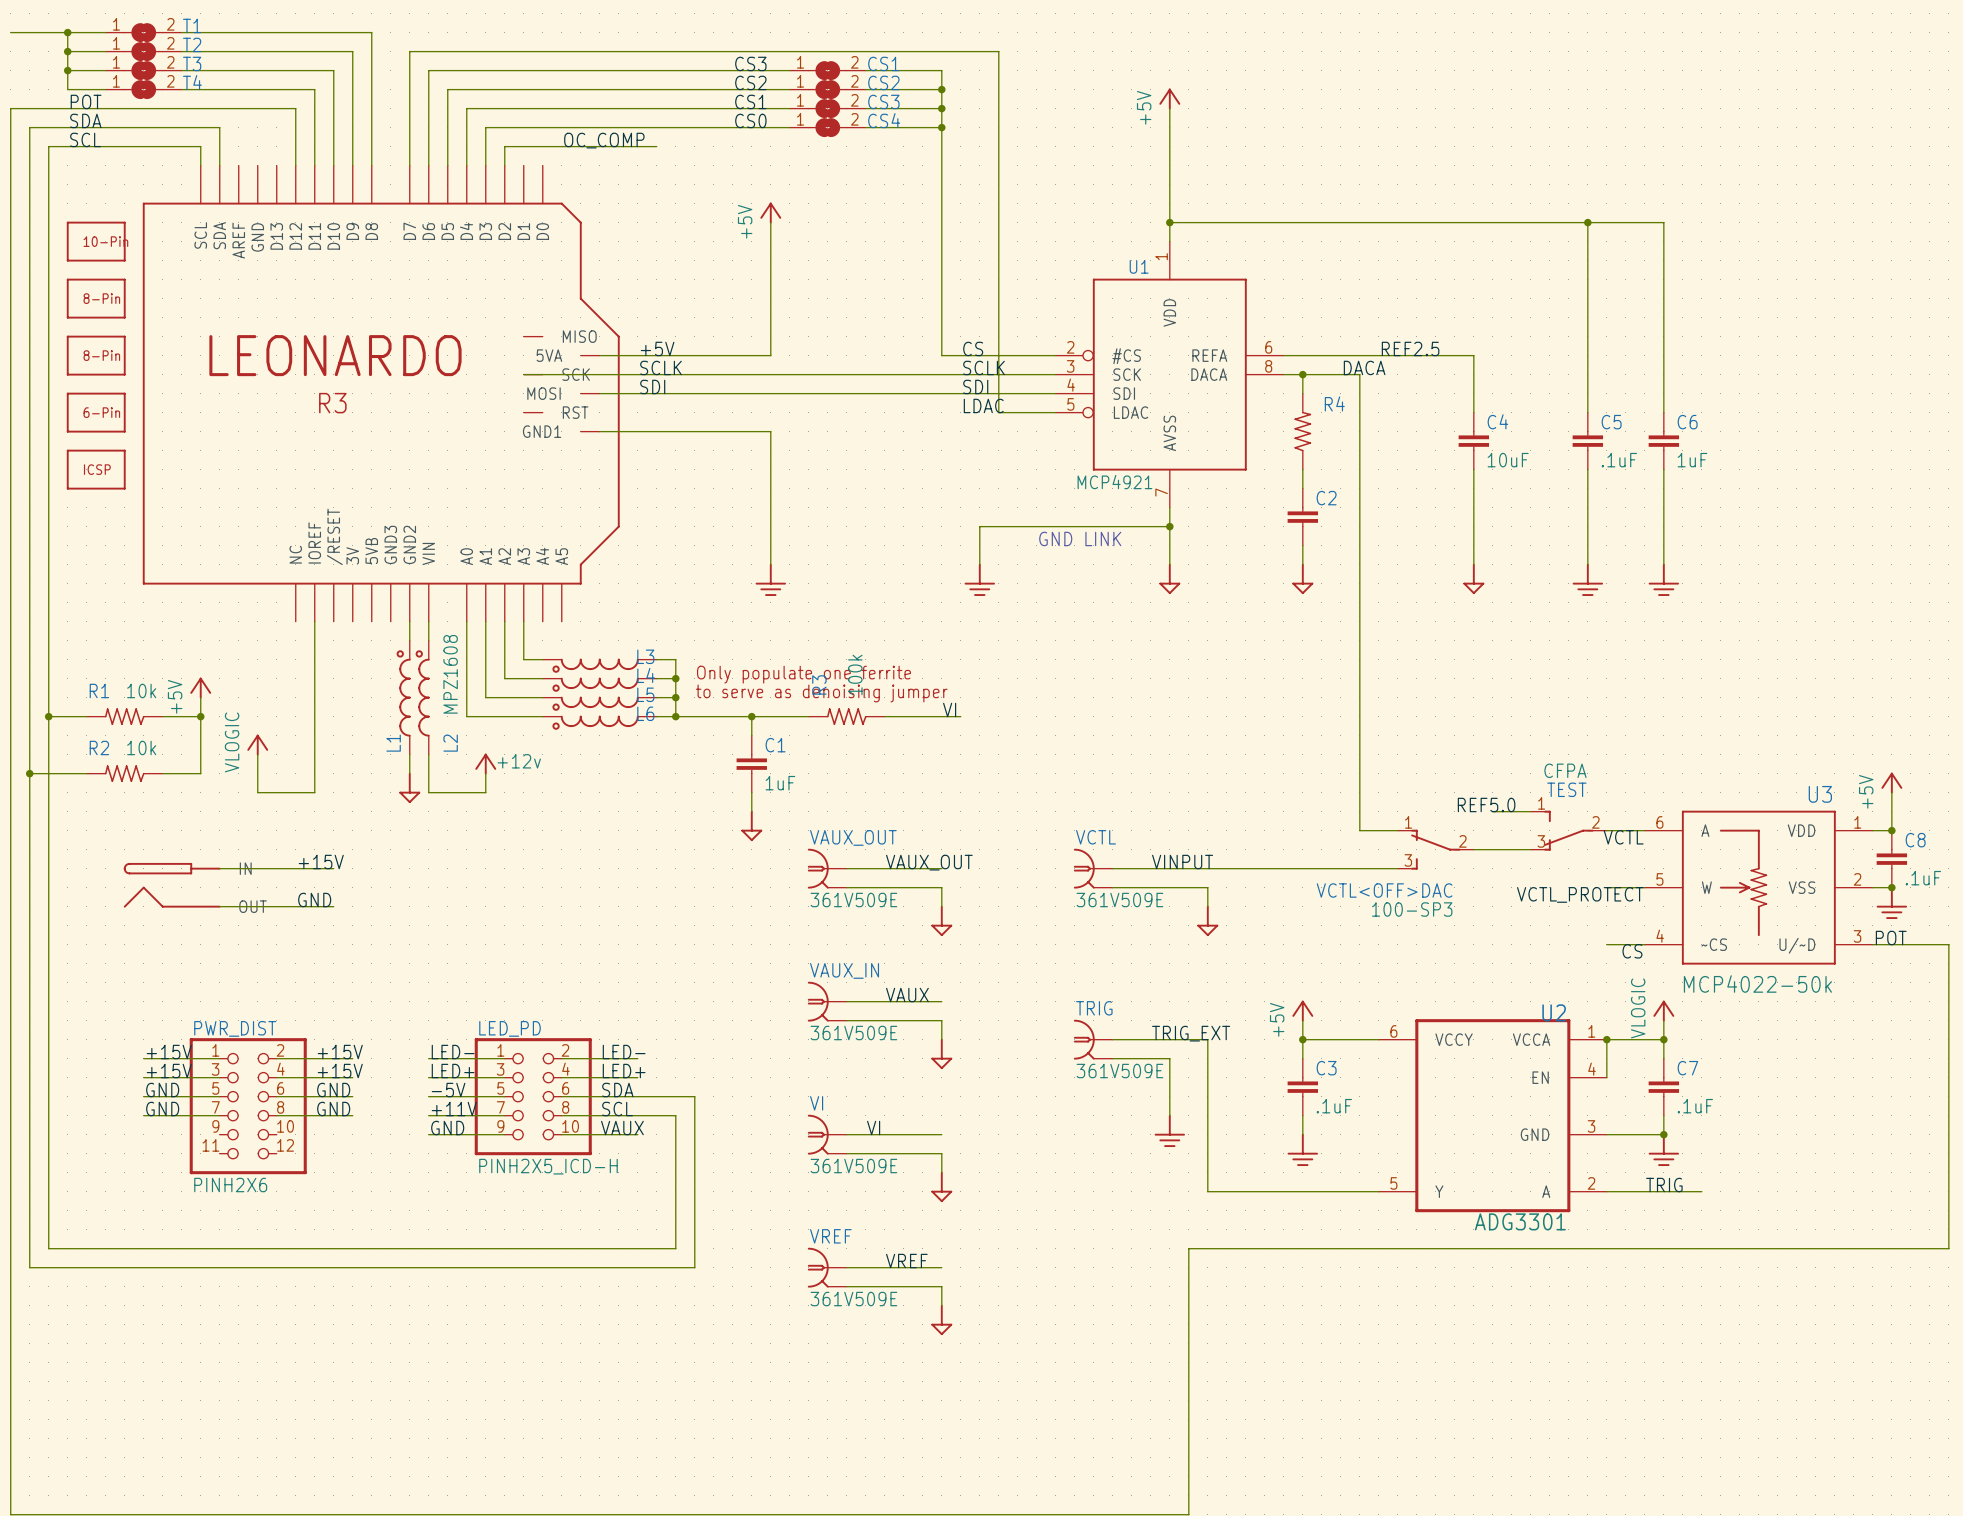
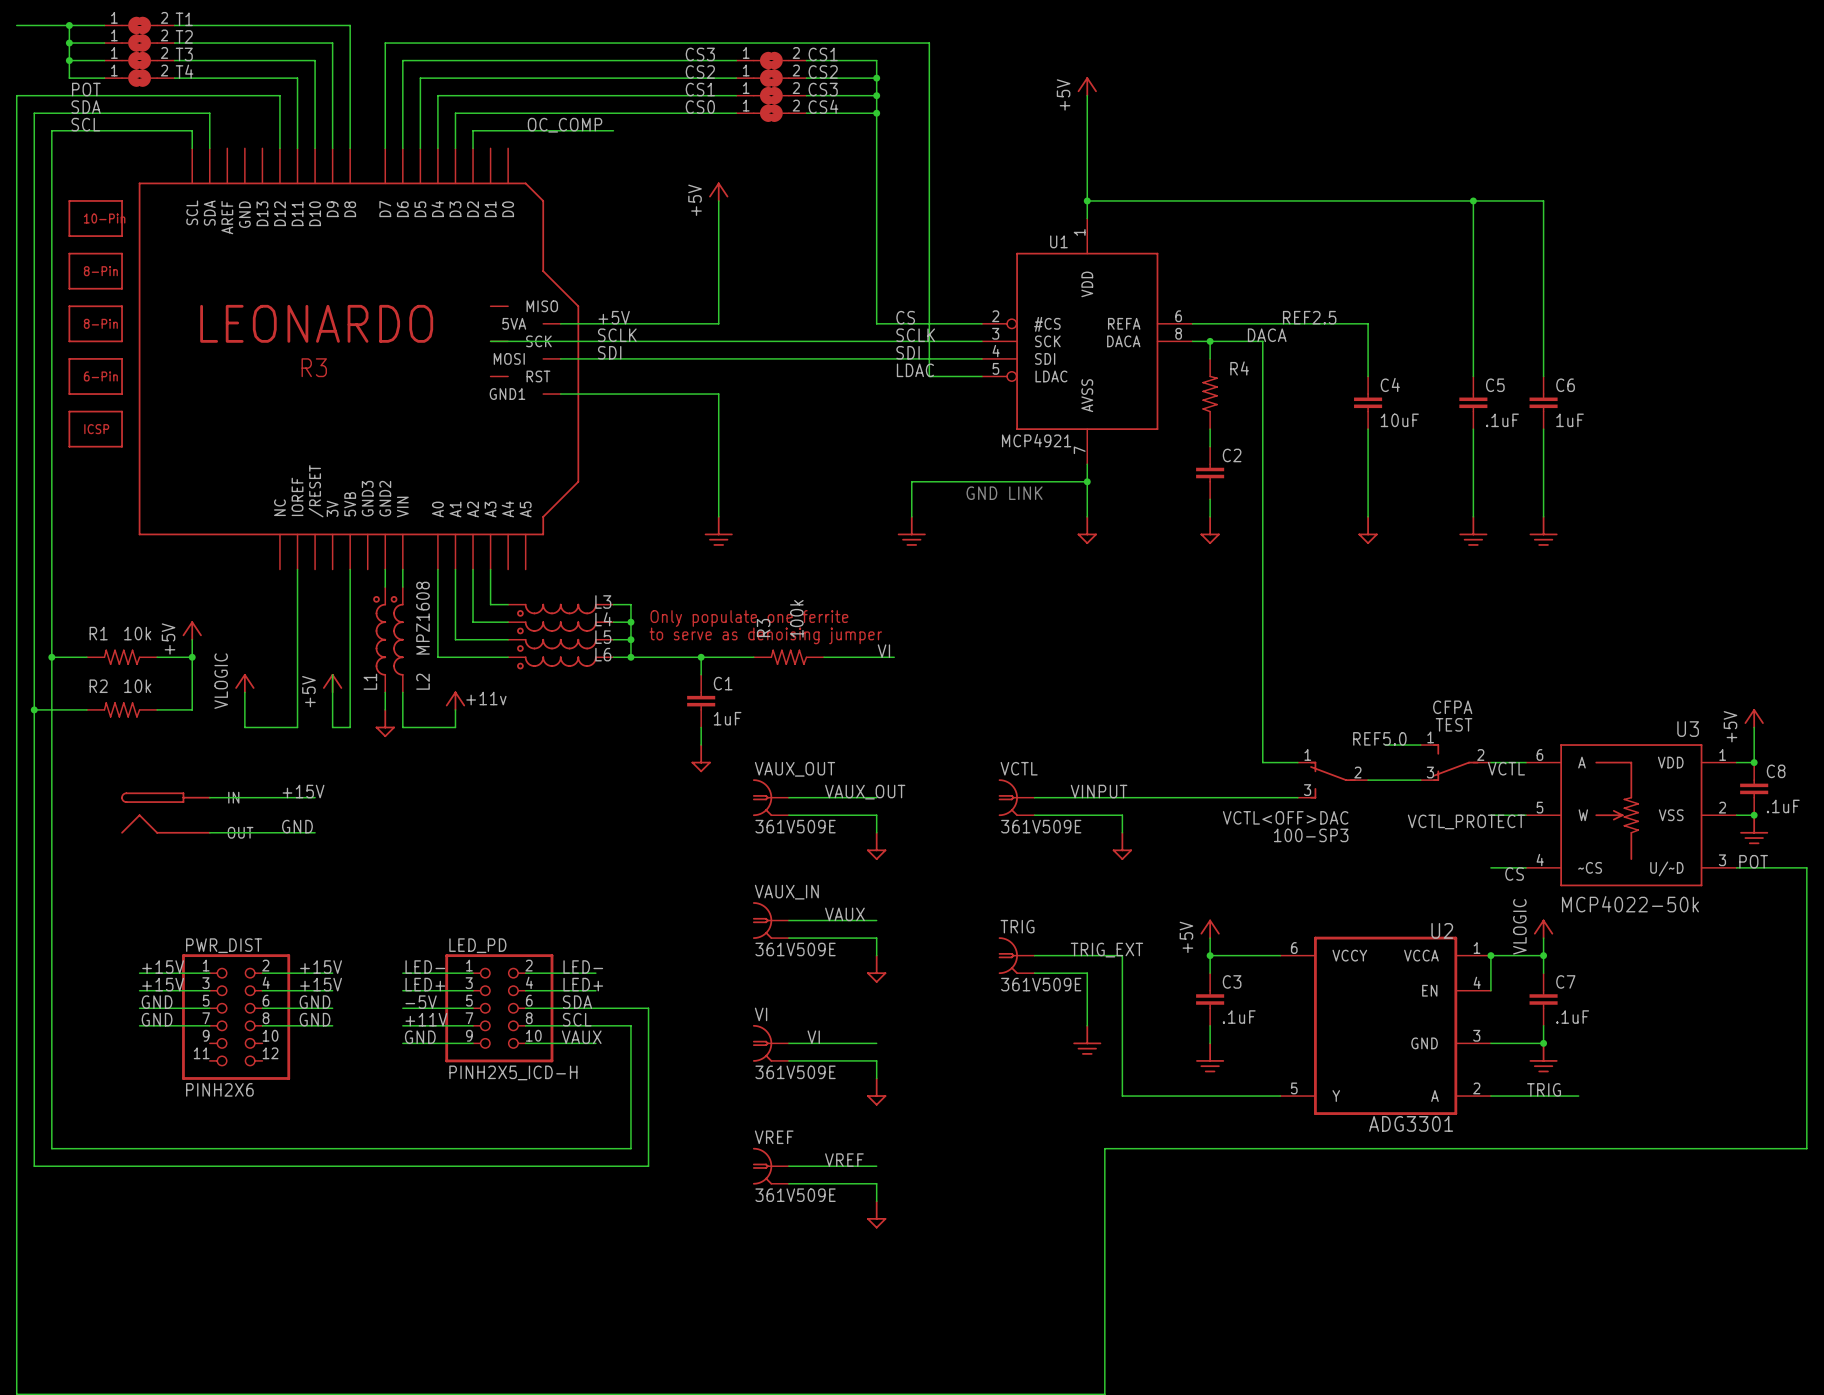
wire: none -> (350, 569) (350, 727) (332, 727) (332, 674)
part: none -> +5V (332, 683)
part value: +12v (519, 761) -> +11v (486, 698)

